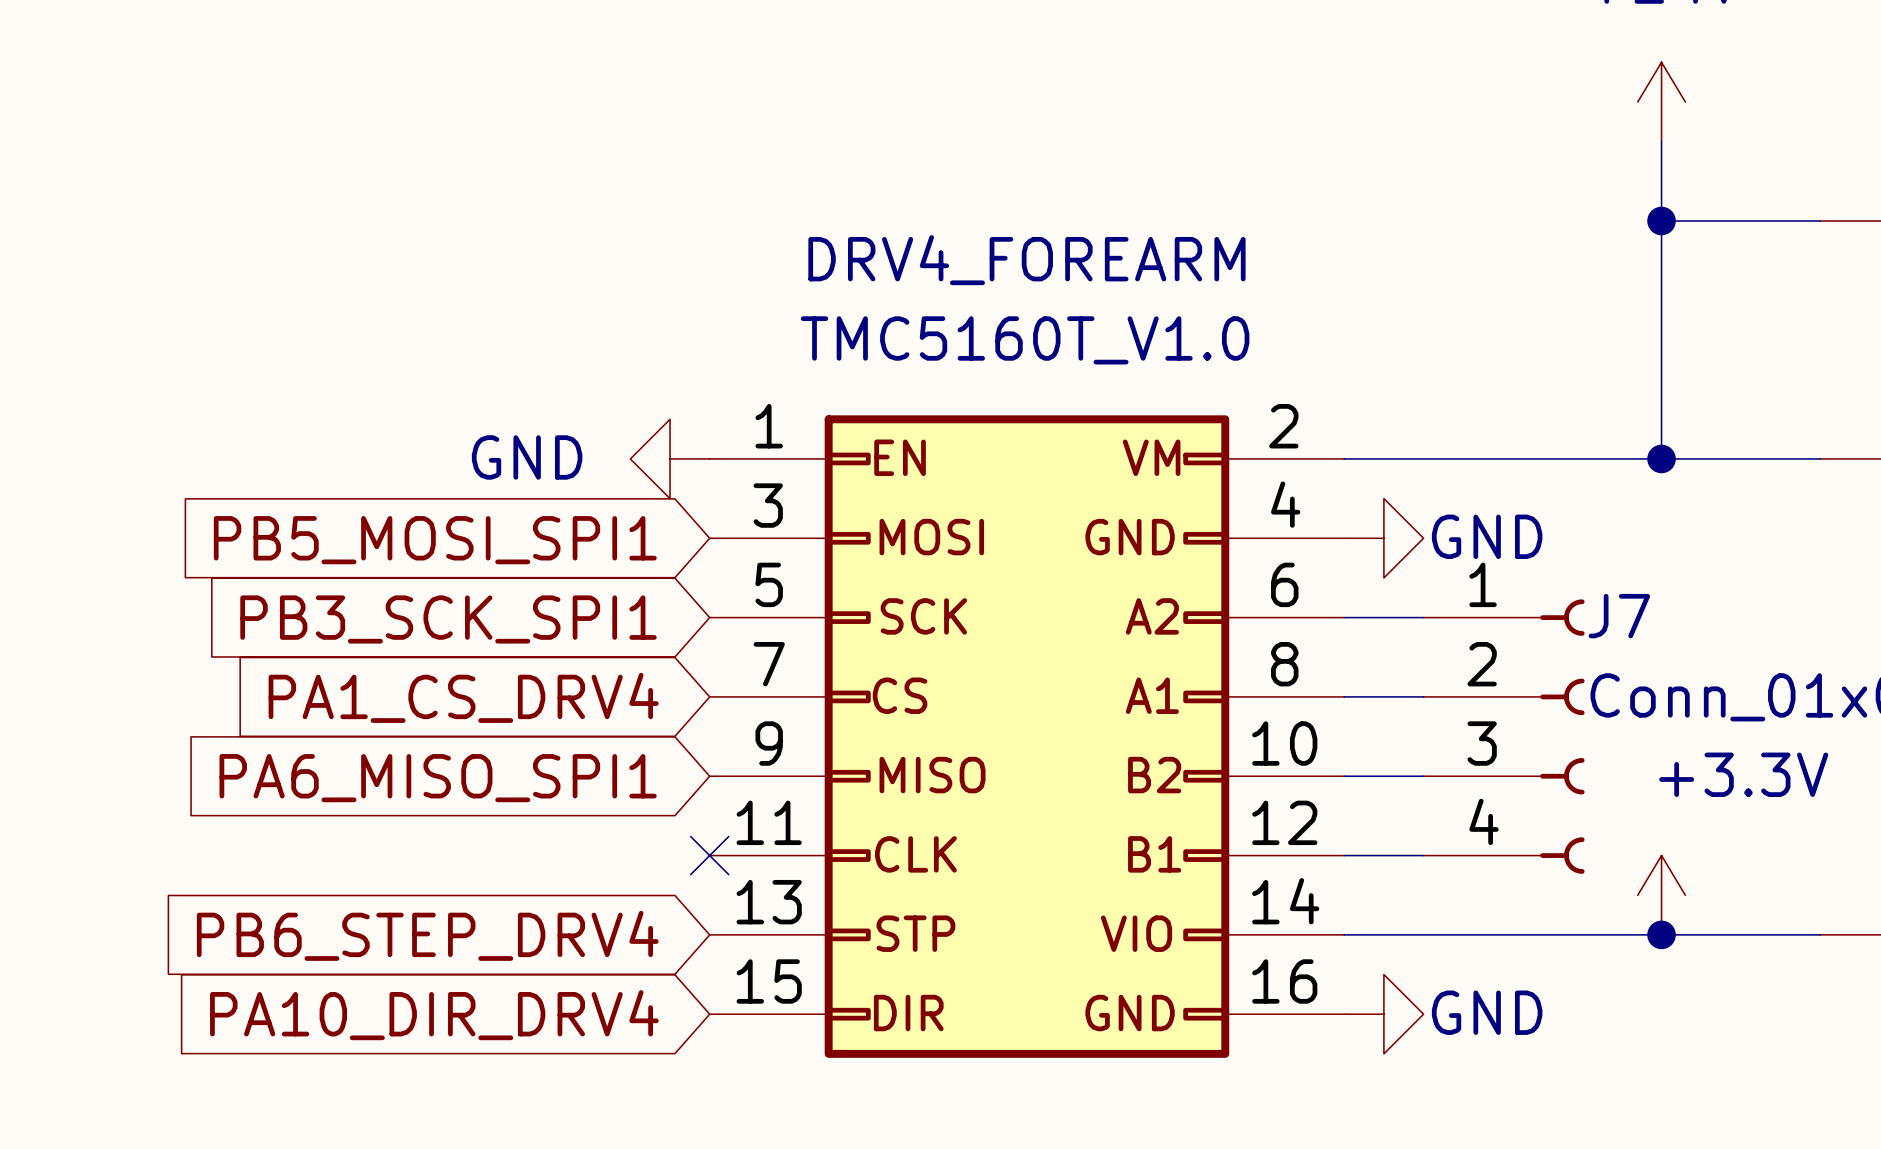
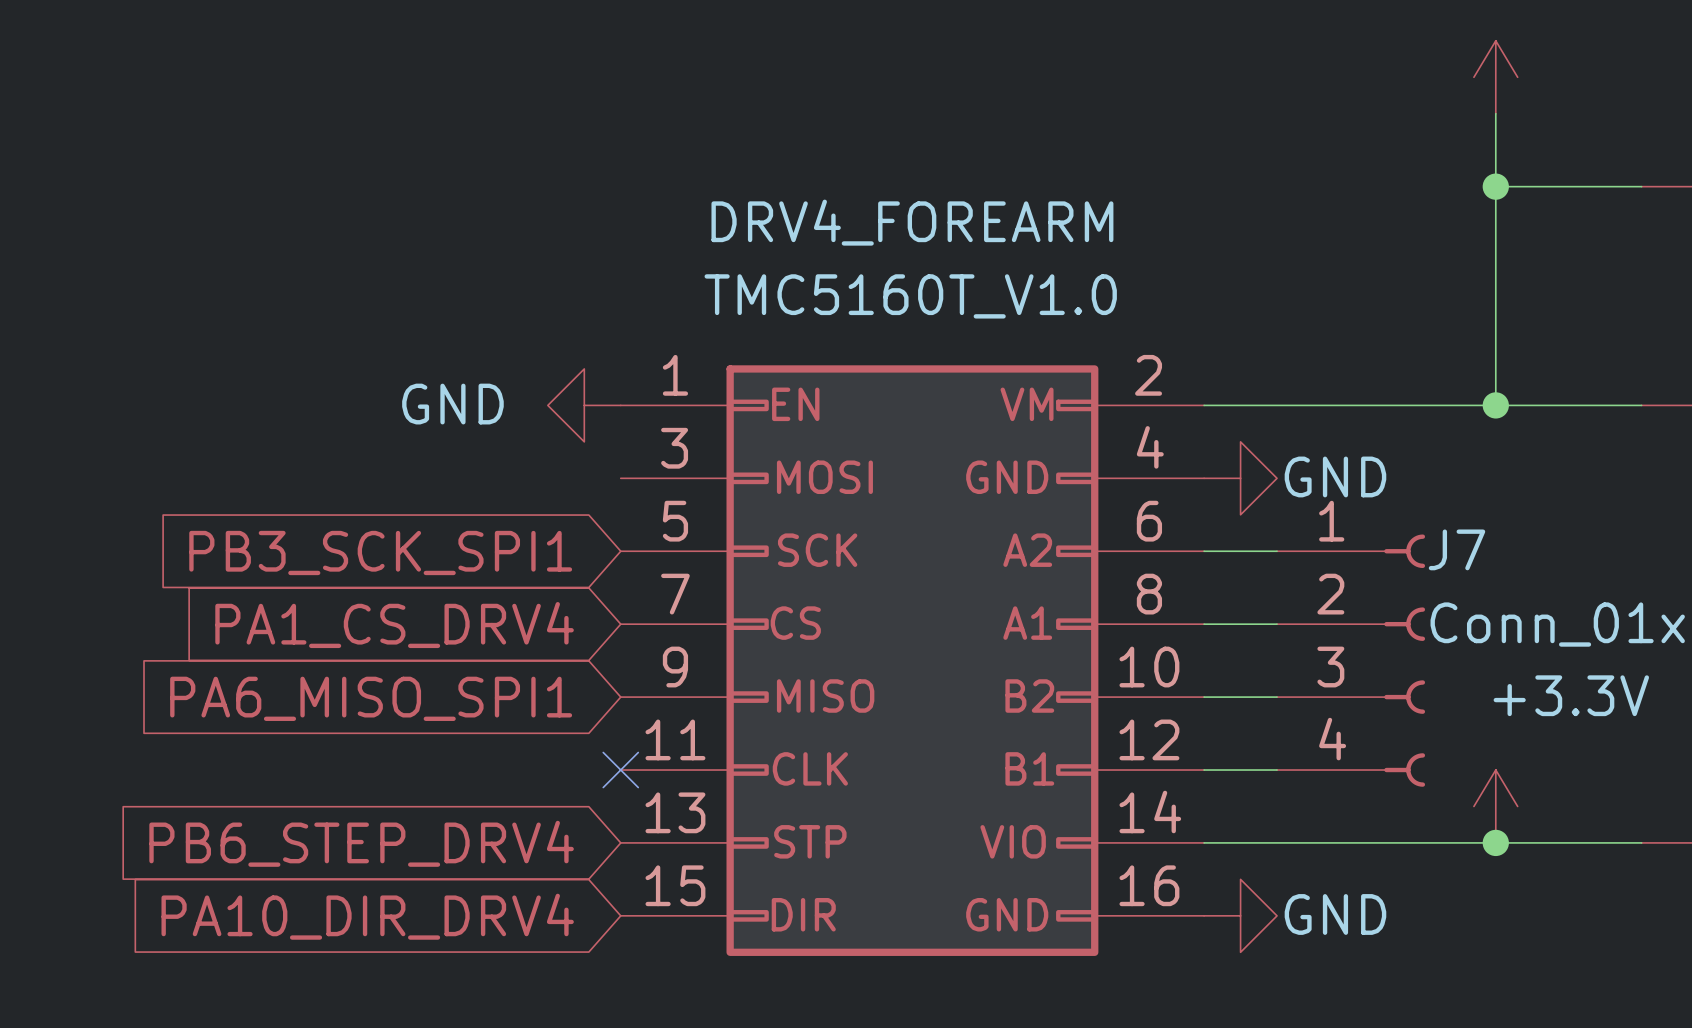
global label: PB5_MOSI_SPI1 (435, 540) -> none

